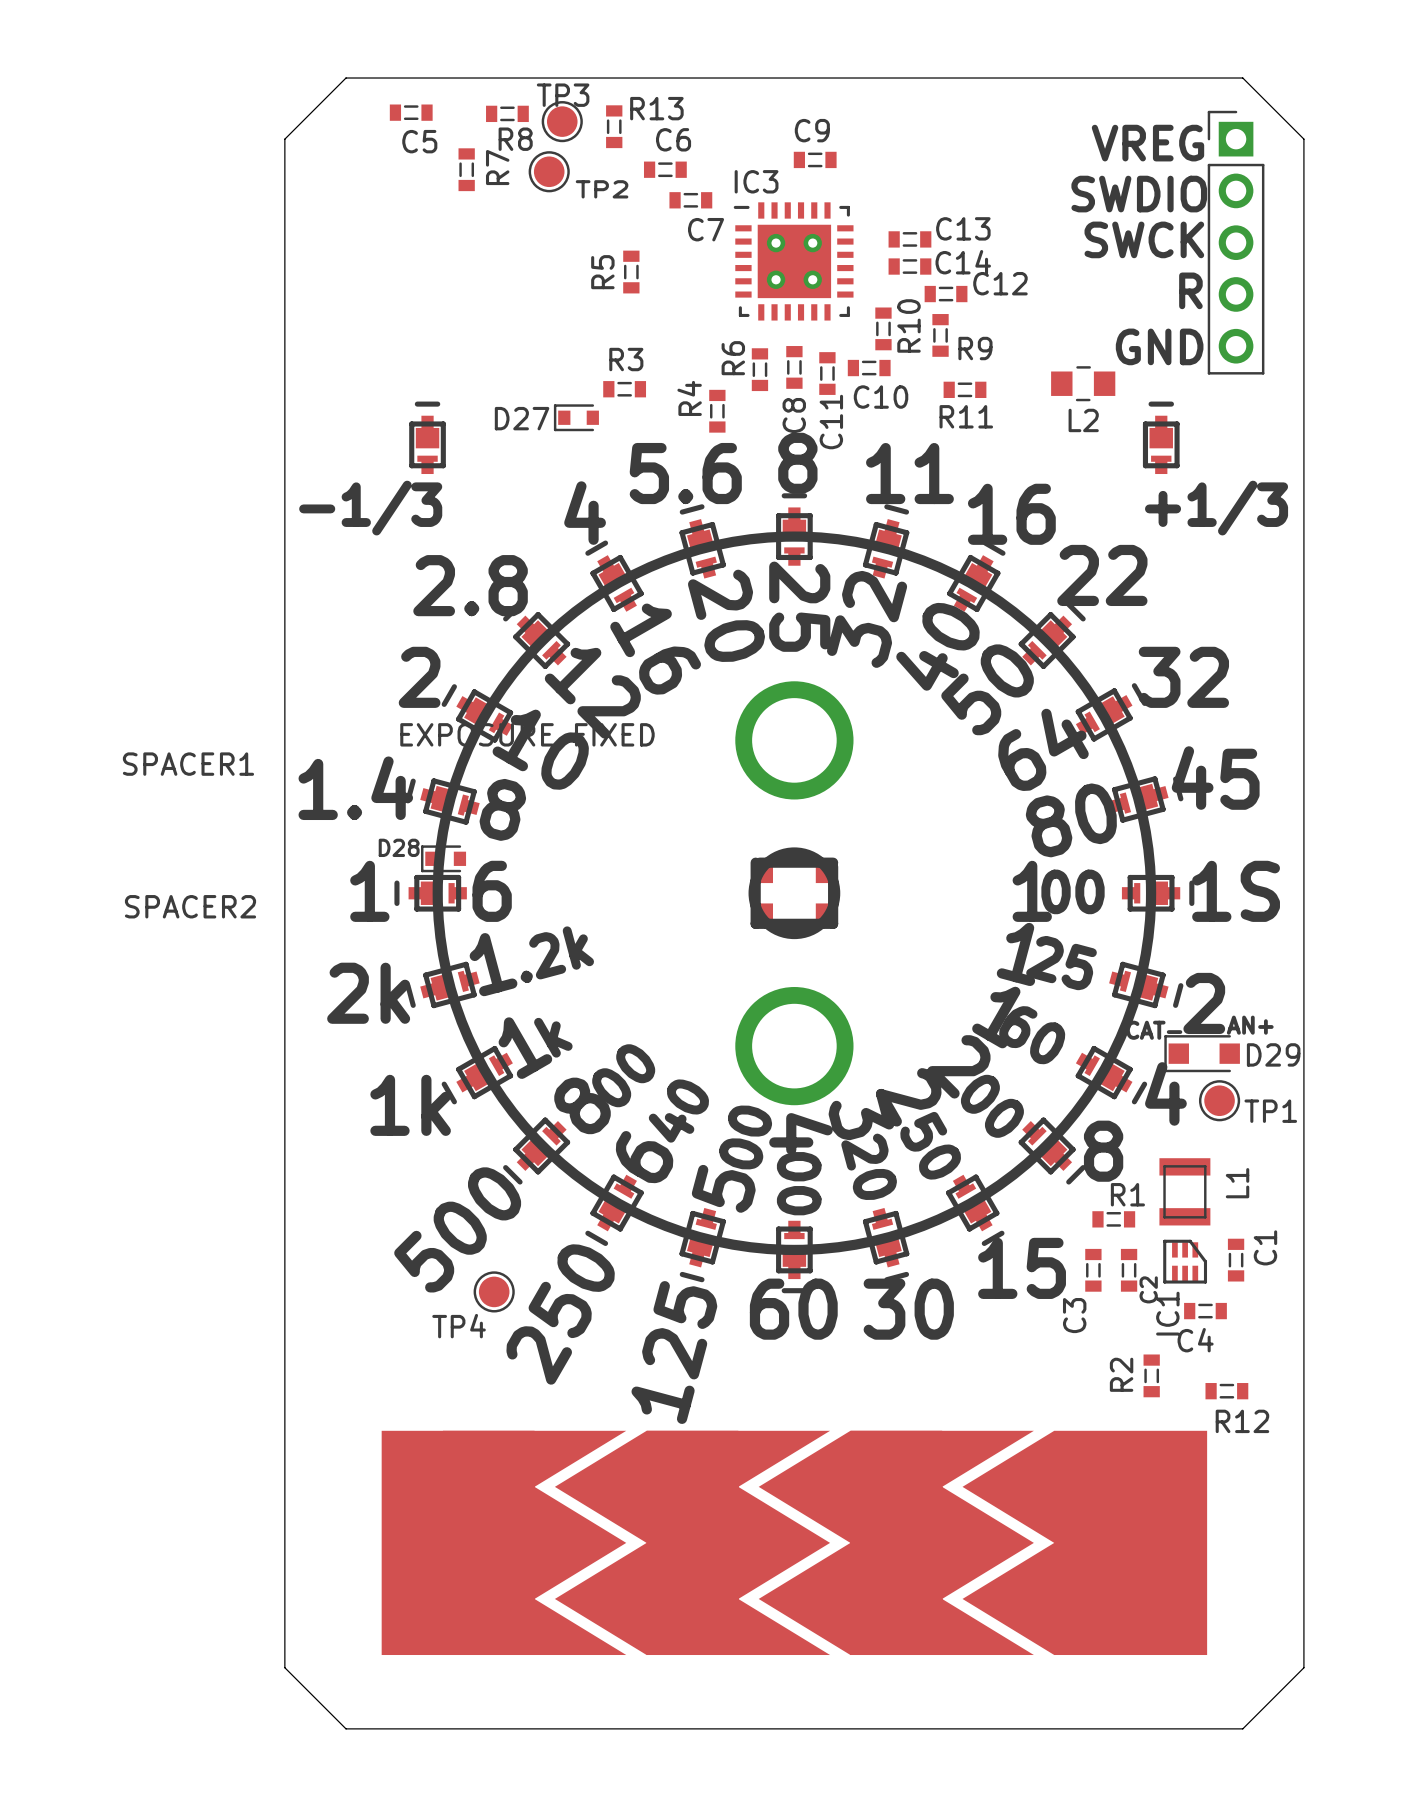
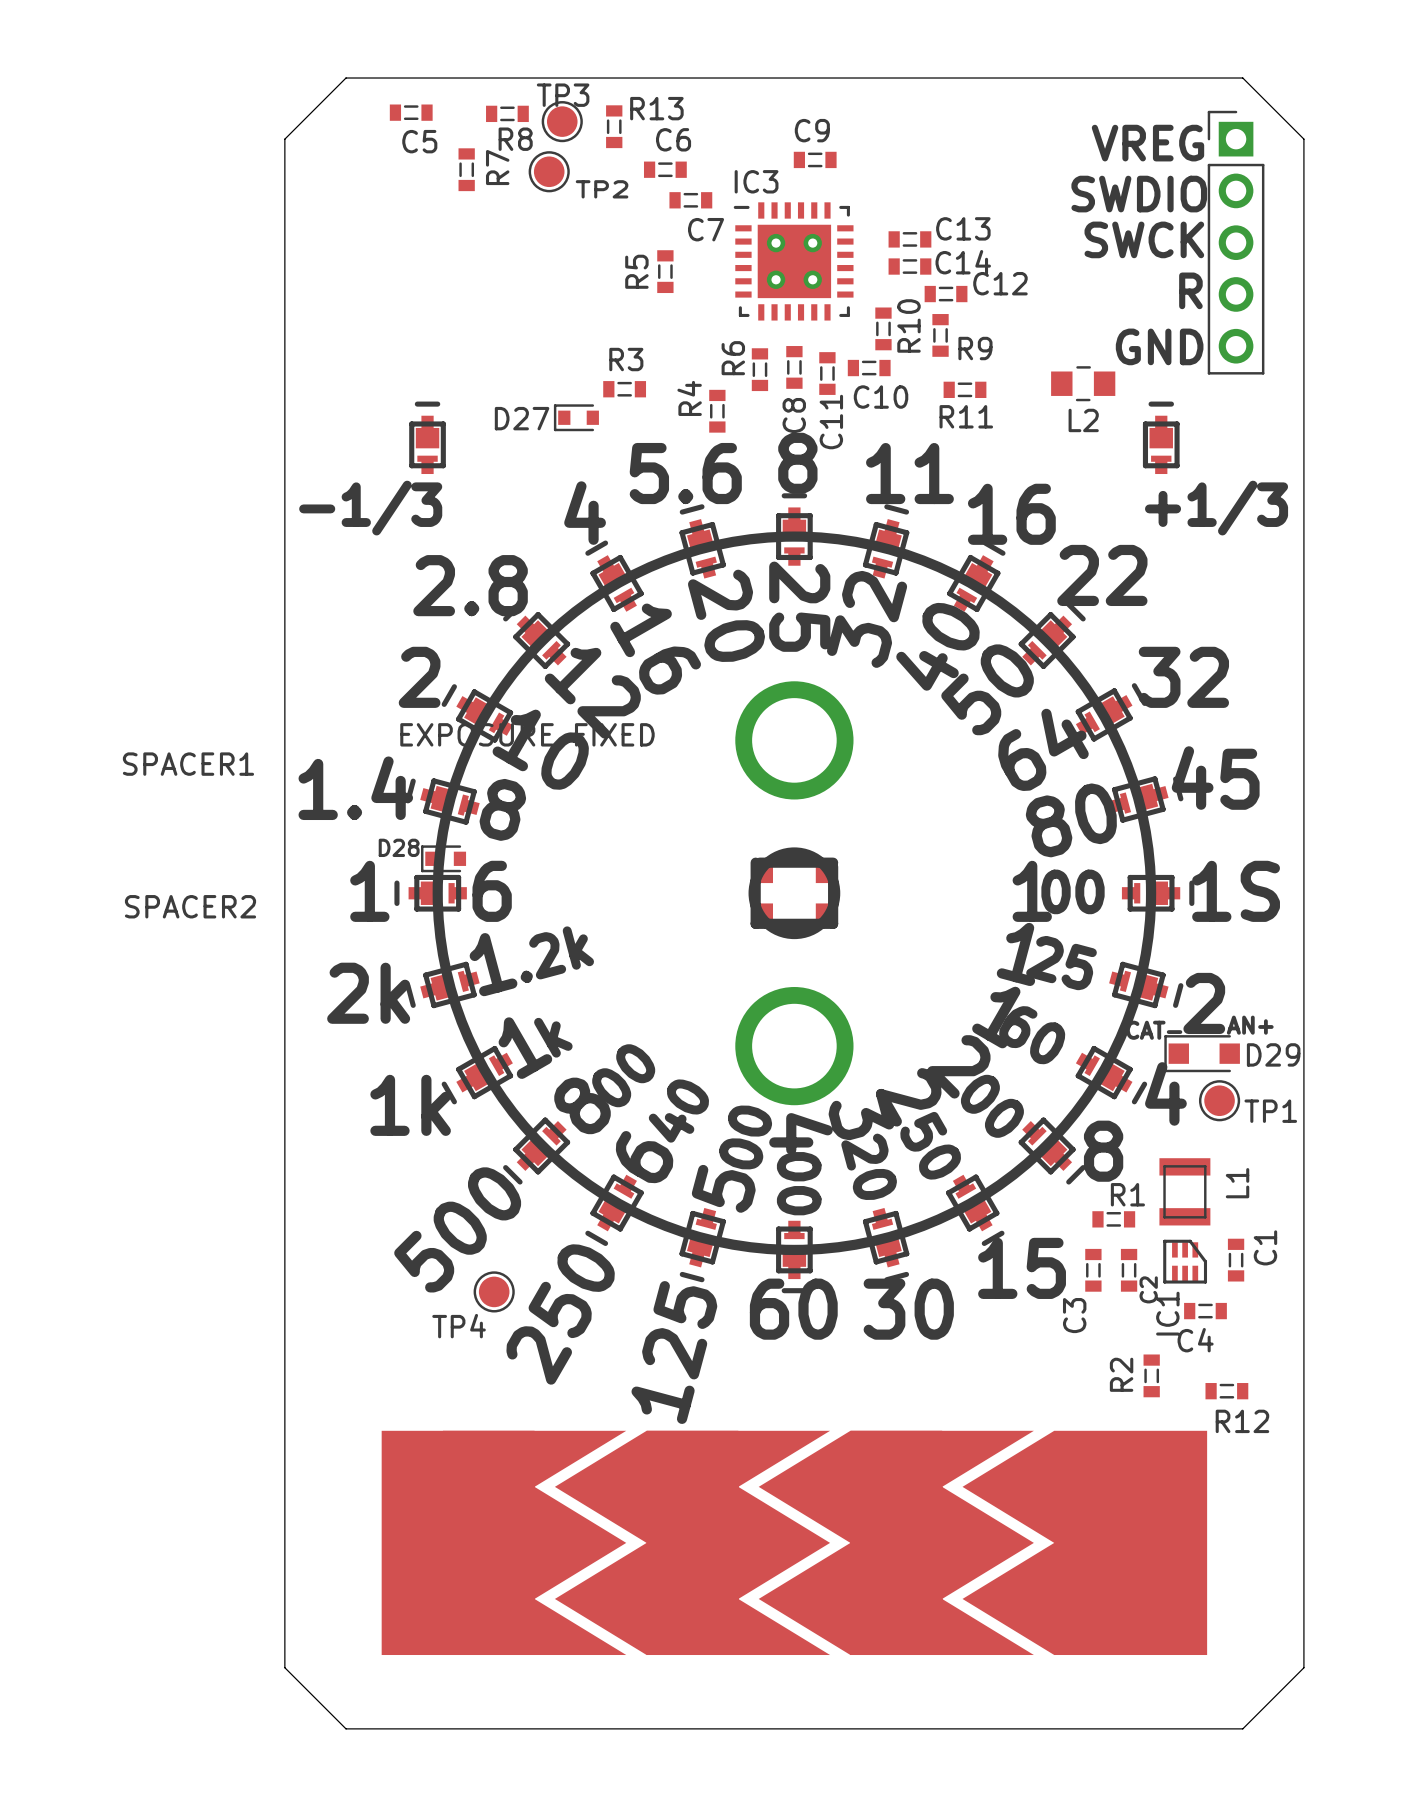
R5 position: (631, 272) -> (665, 271)

